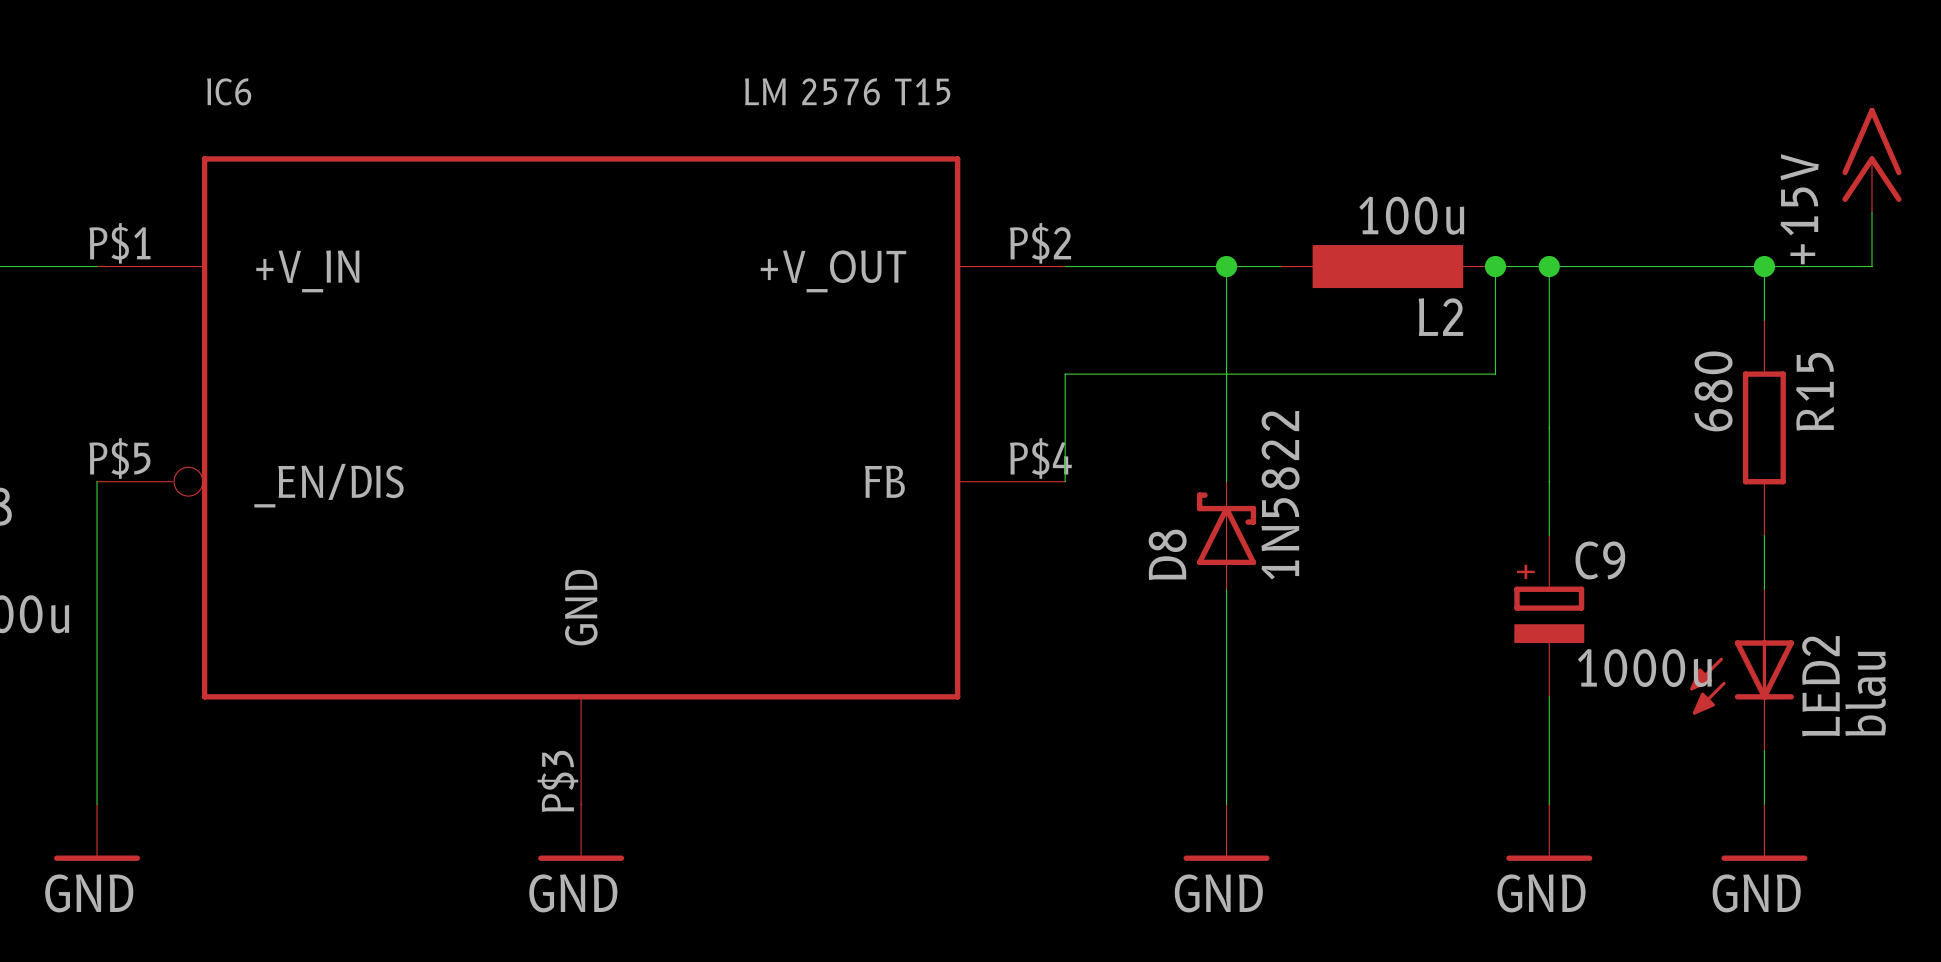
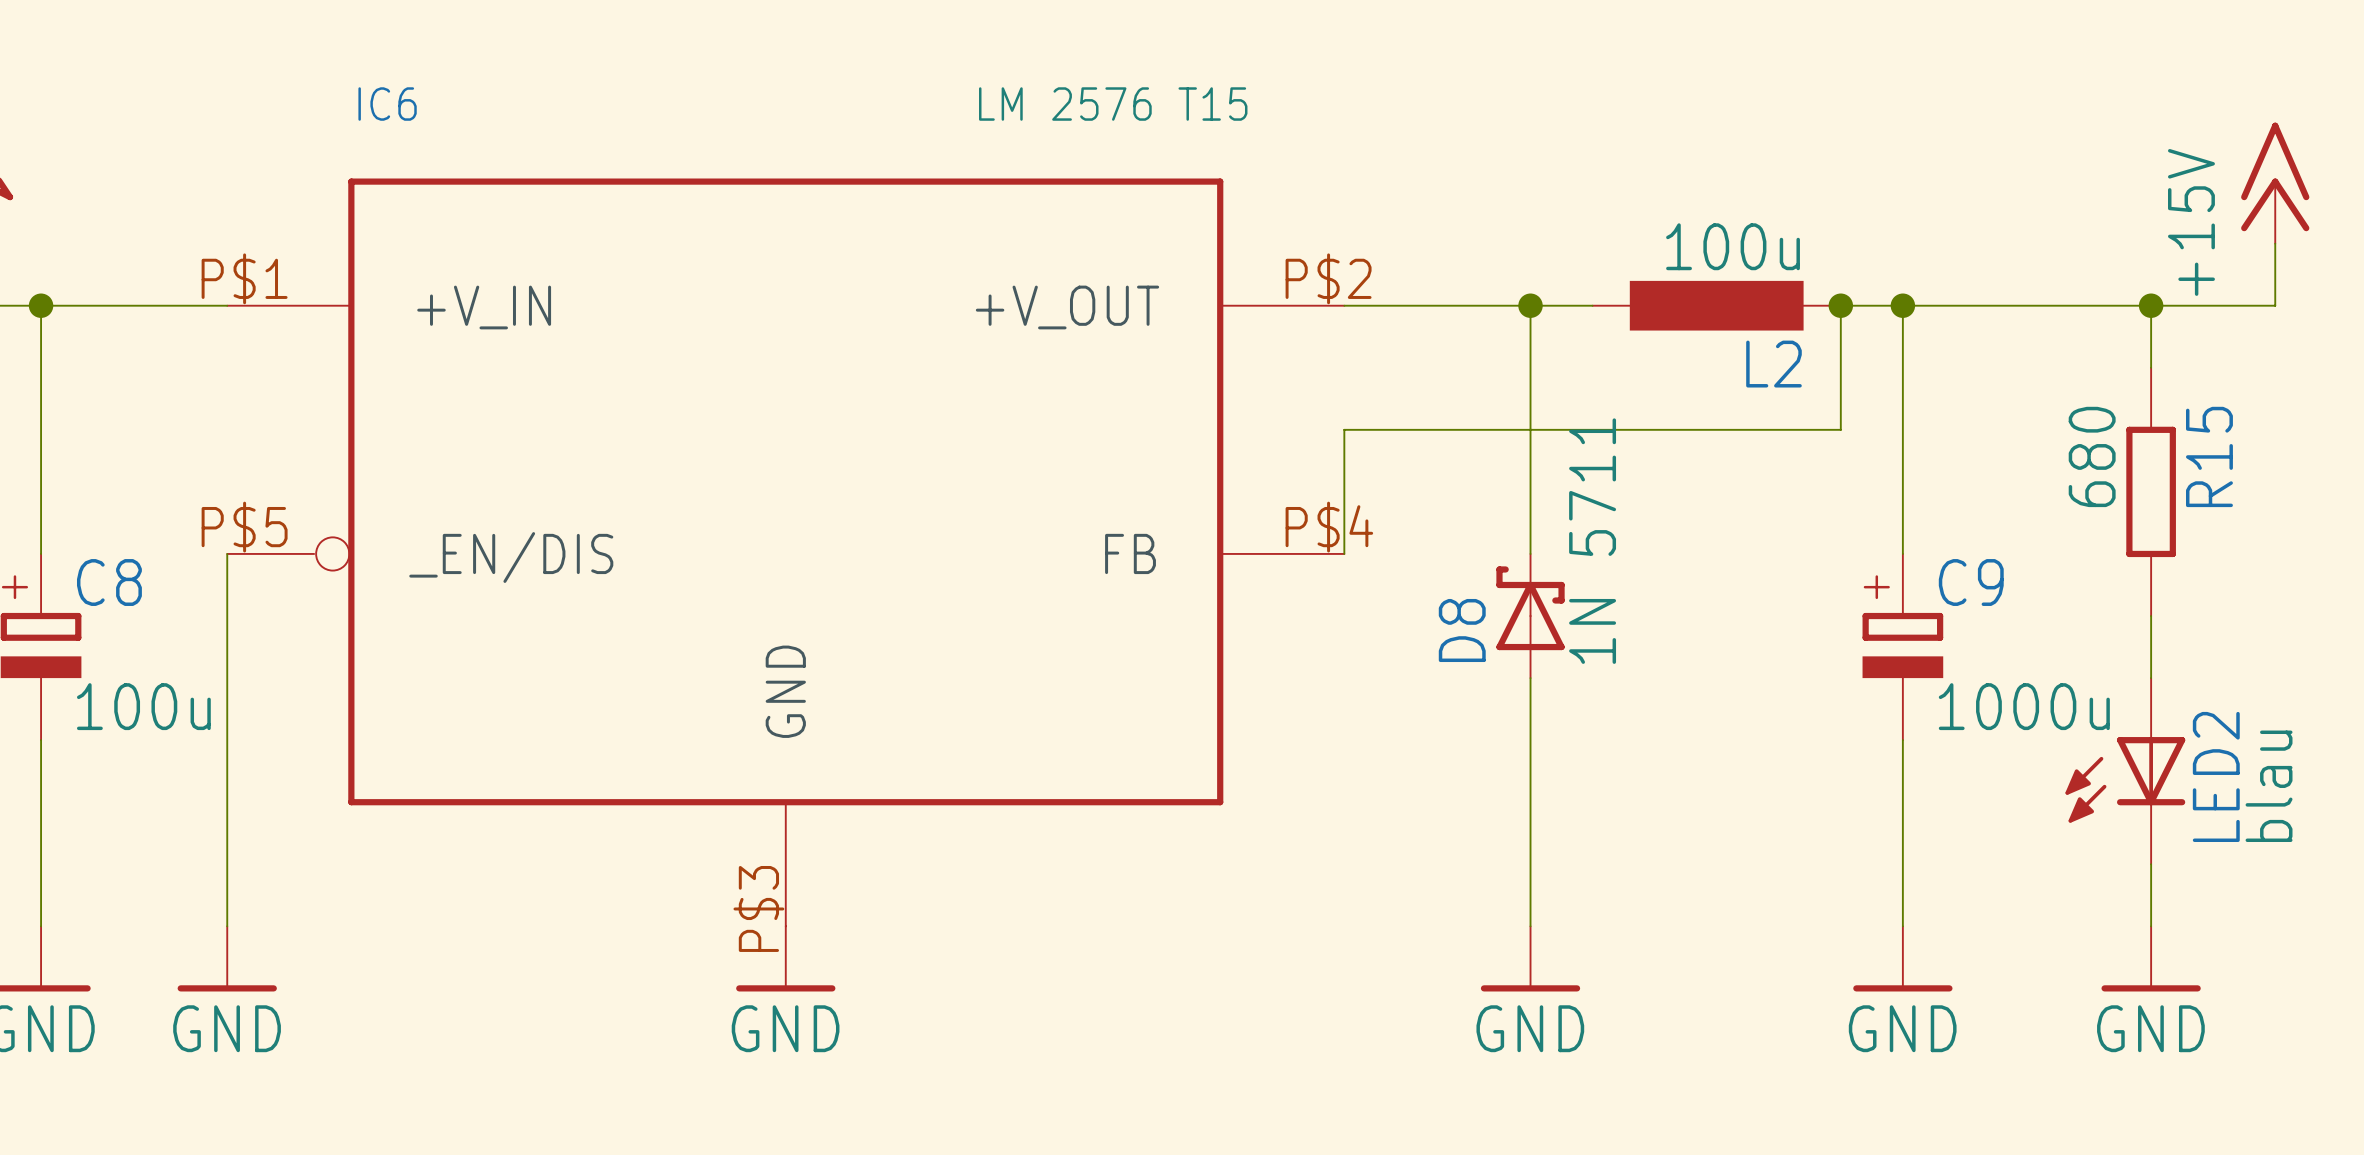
D8 value: 1N5822 (1280, 495) -> 1N 5711 (1592, 541)
C9 position: (1549, 616) -> (1902, 647)

